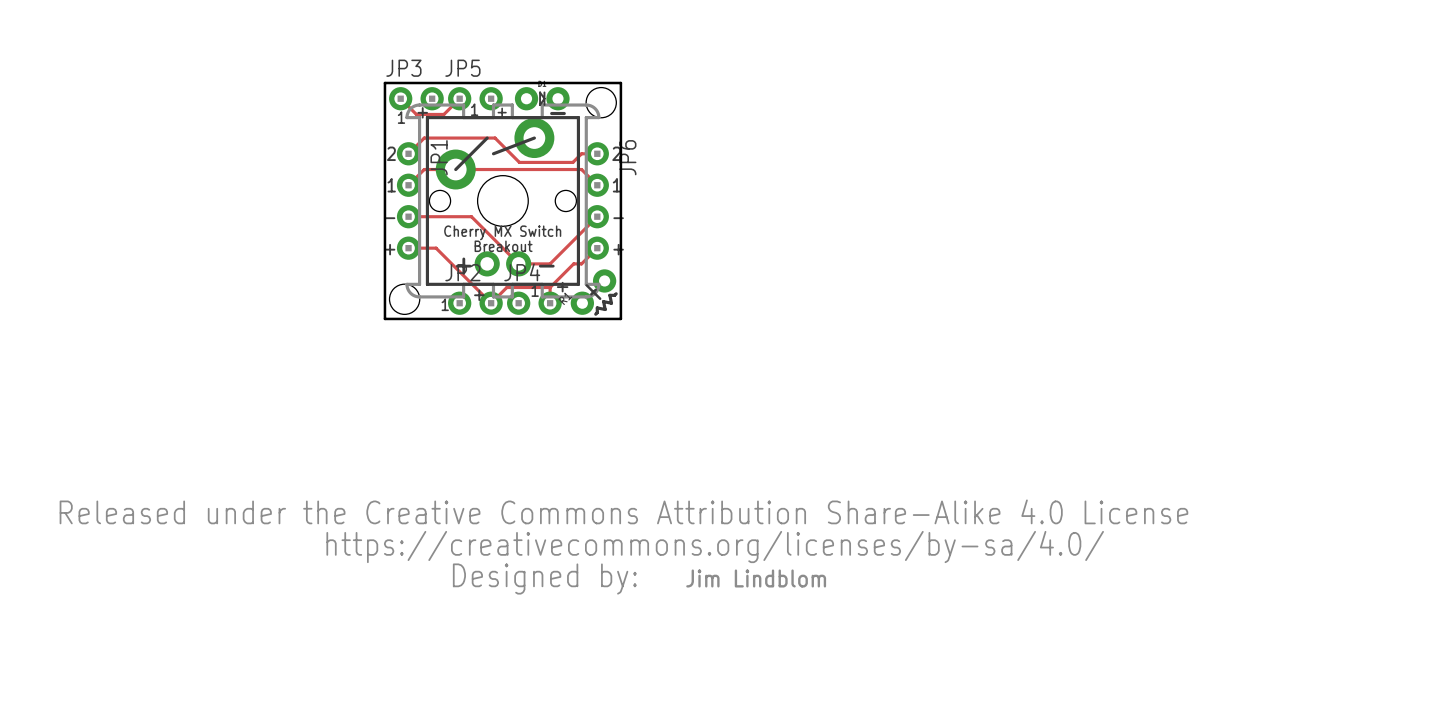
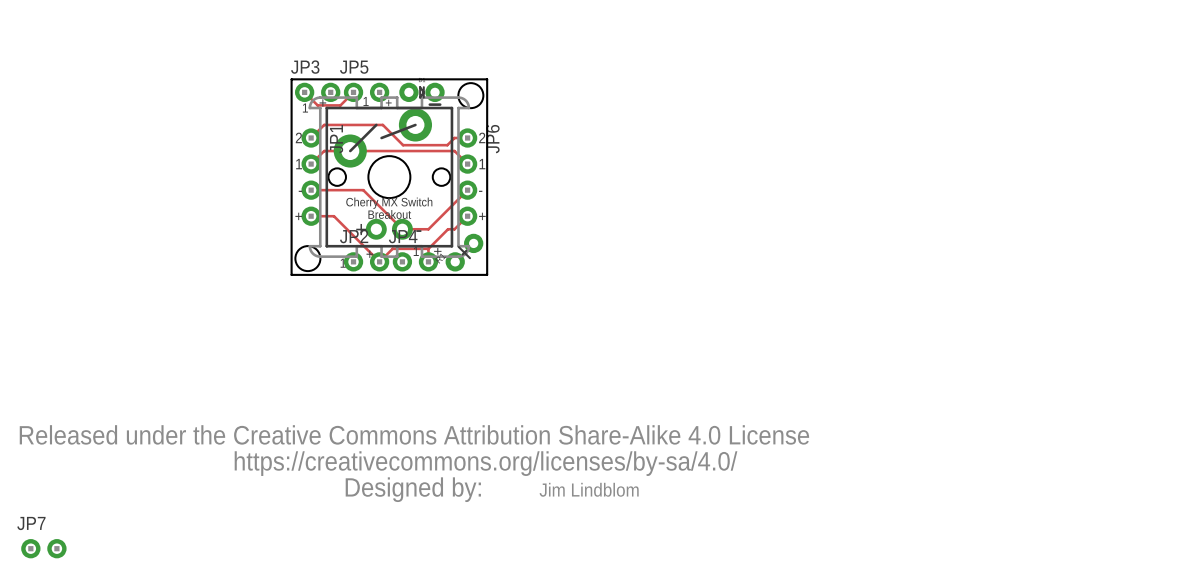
line: (616, 293) (609, 295) (611, 303) (603, 301) (605, 309) (597, 307) (595, 314) -> none
JP7: none -> (43, 548)

